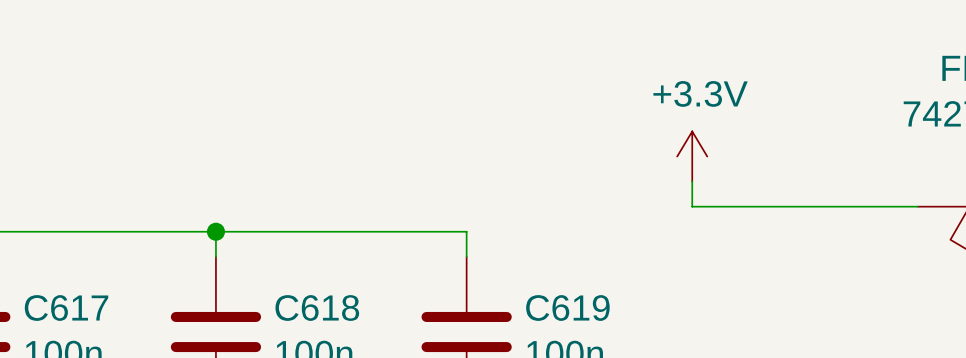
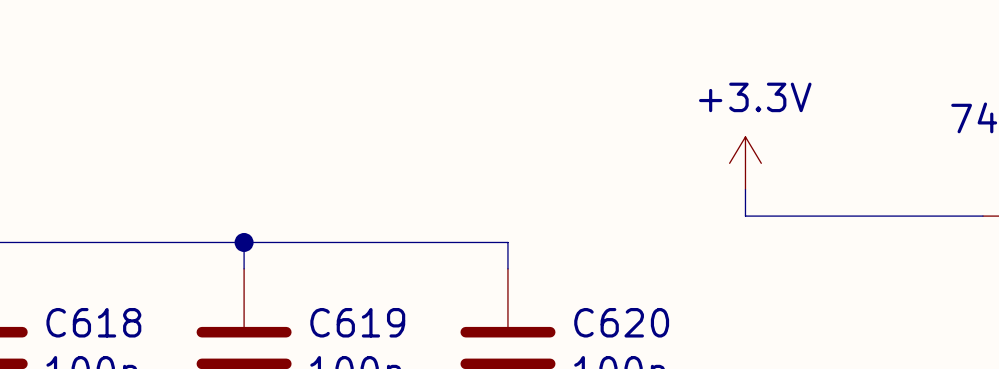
C617 name: C617 (66, 308) -> C618 (93, 322)
C618 name: C618 (317, 308) -> C619 (357, 322)
C619 name: C619 (567, 308) -> C620 (621, 322)

